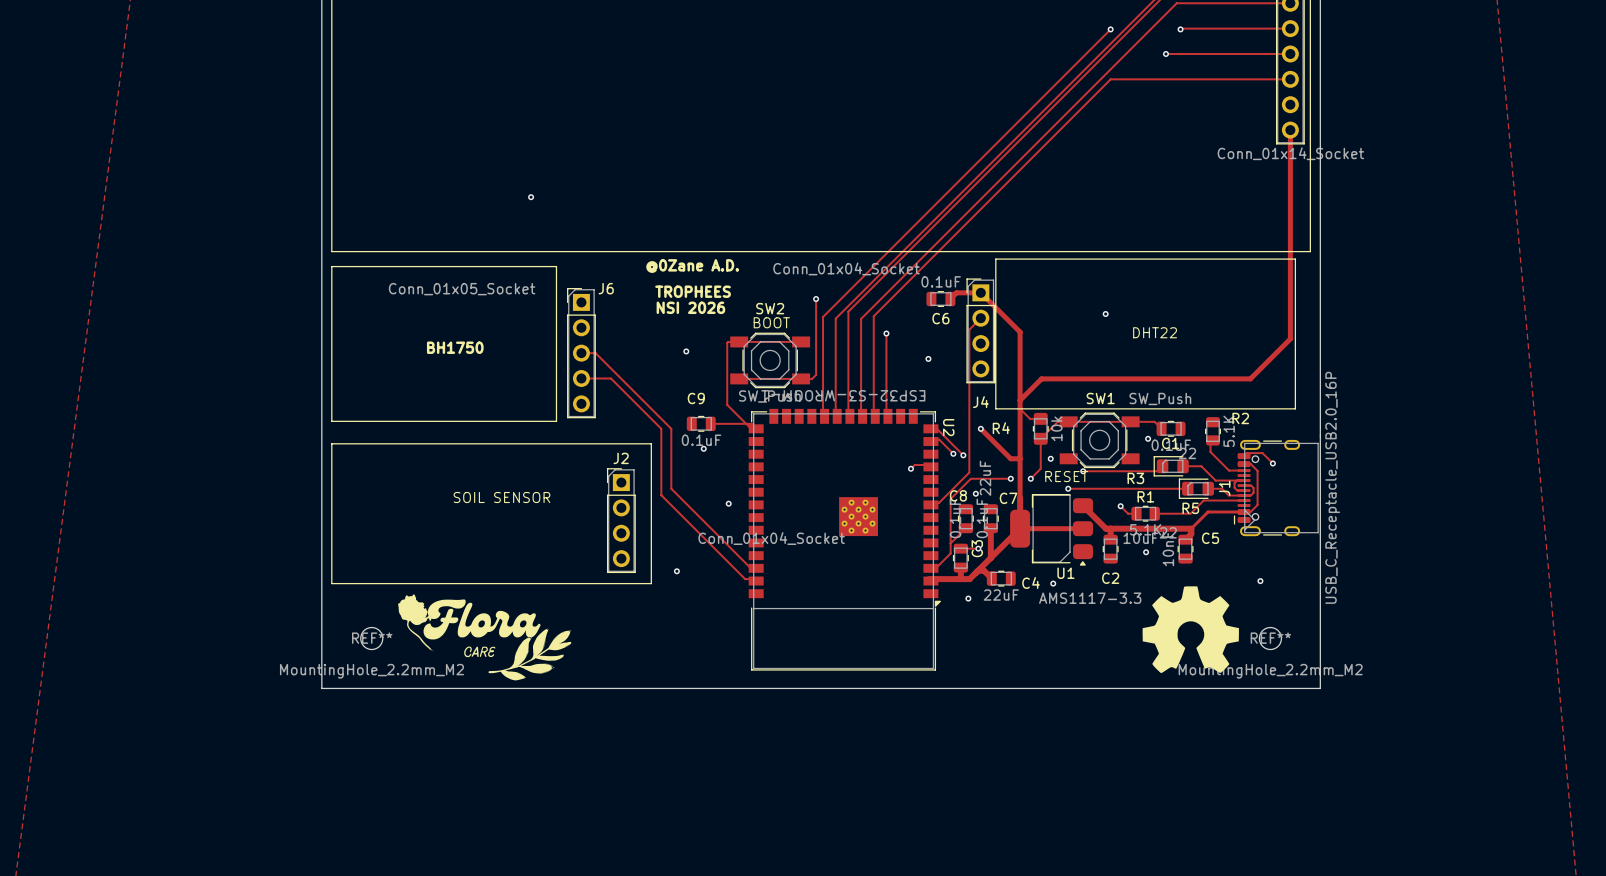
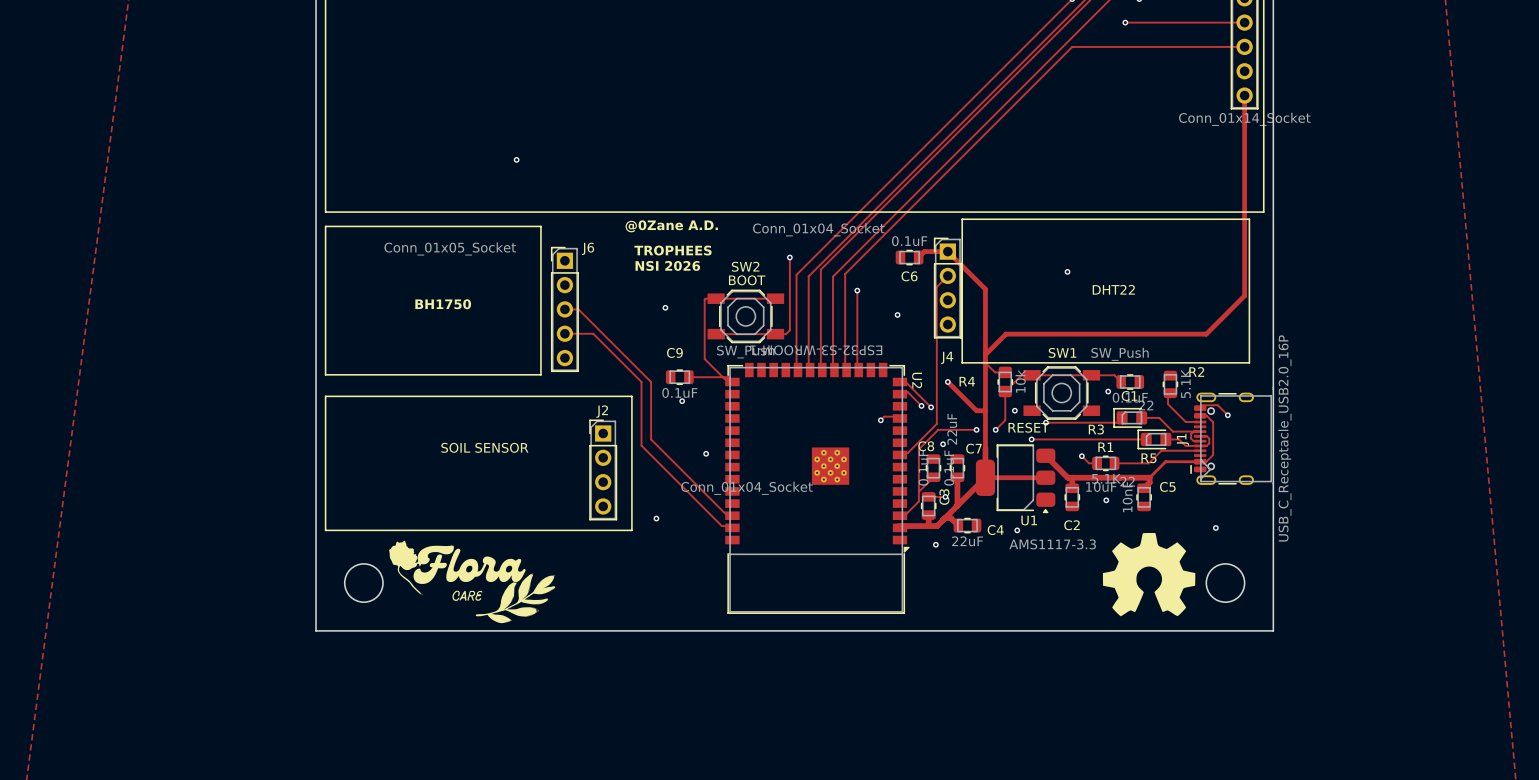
round board edge: none -> [344, 563, 384, 603]
round board edge: none -> [1206, 563, 1245, 603]
REF**: MountingHole_2.2mm_M2 (371, 638) -> none
REF**: MountingHole_2.2mm_M2 (1270, 638) -> none

